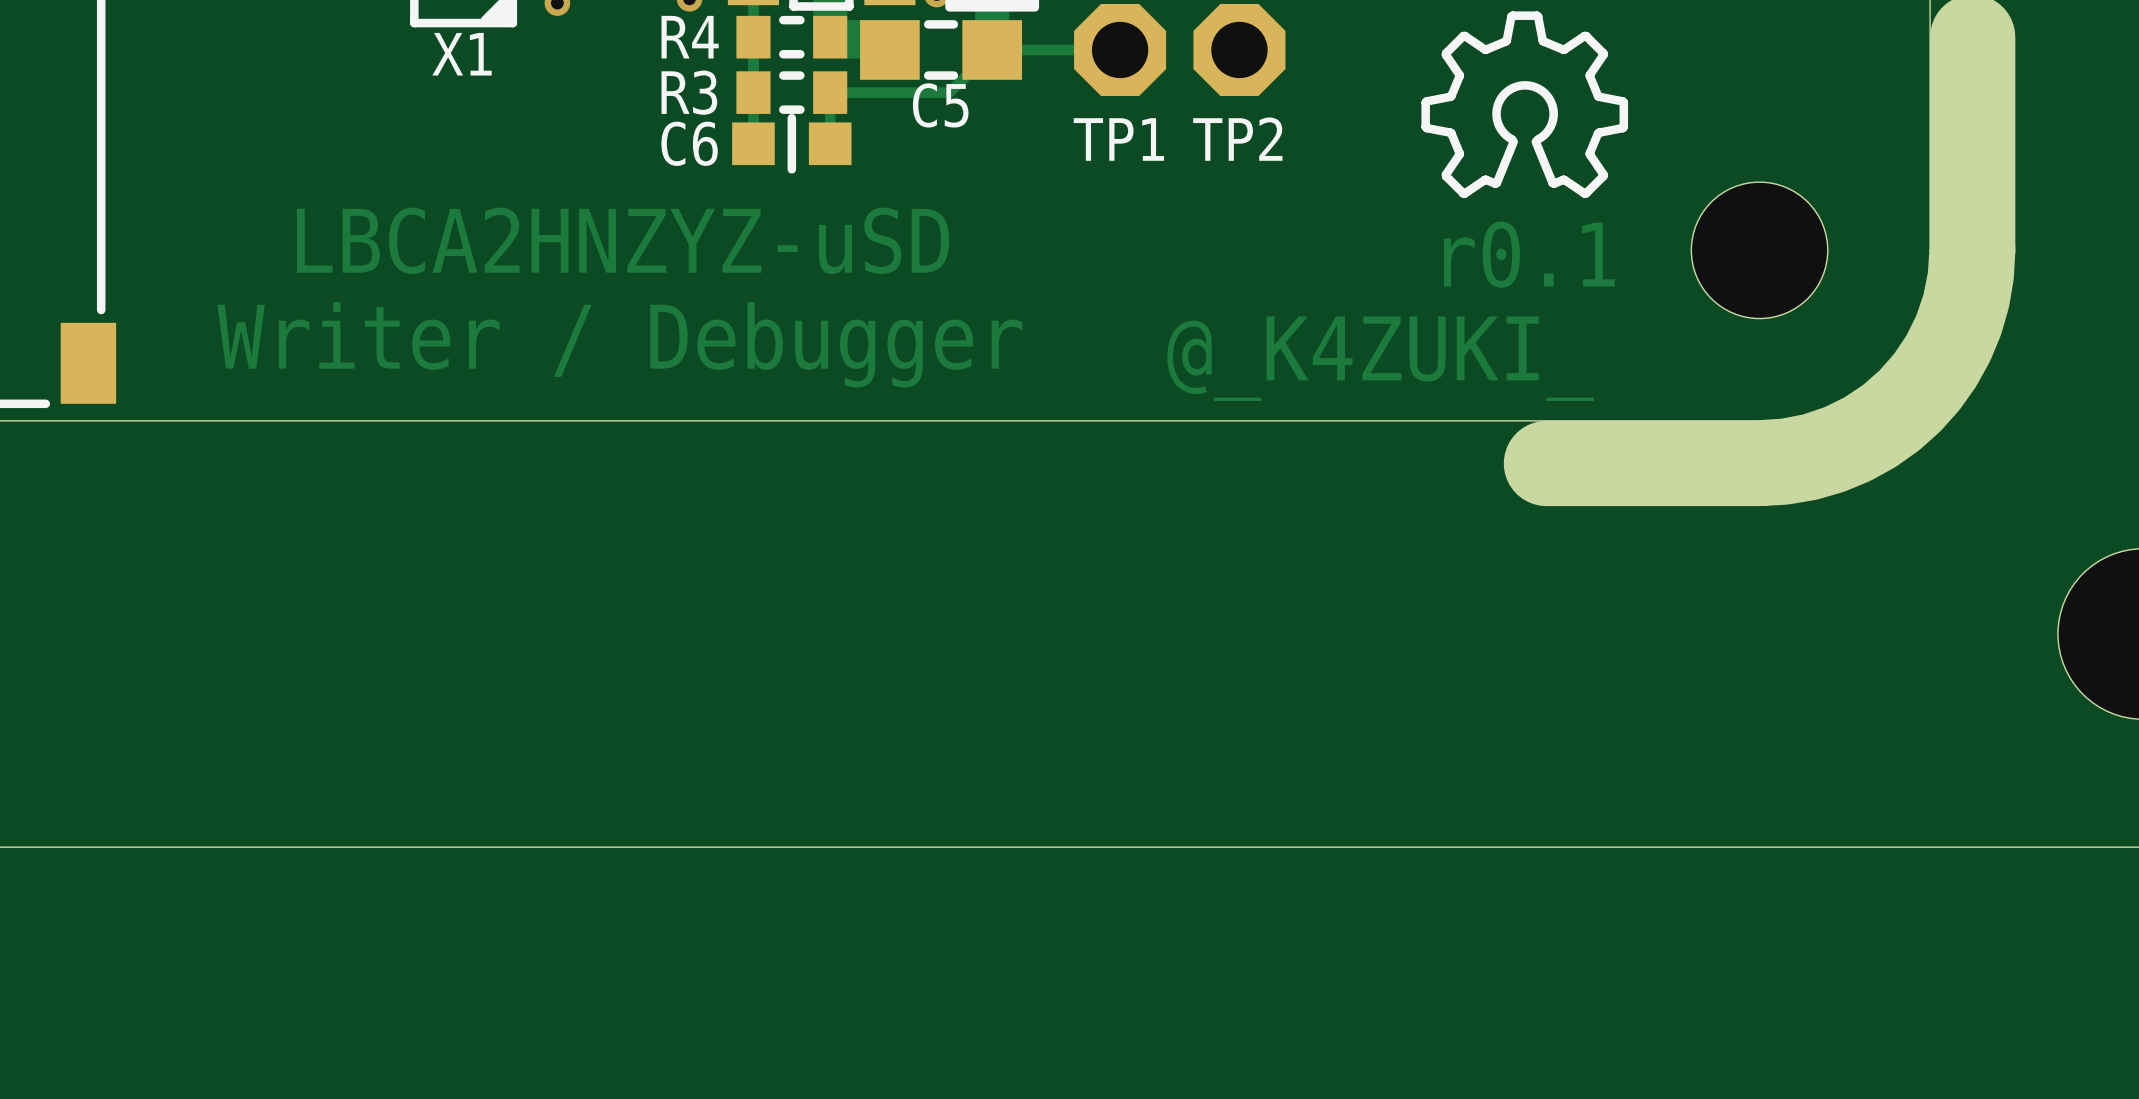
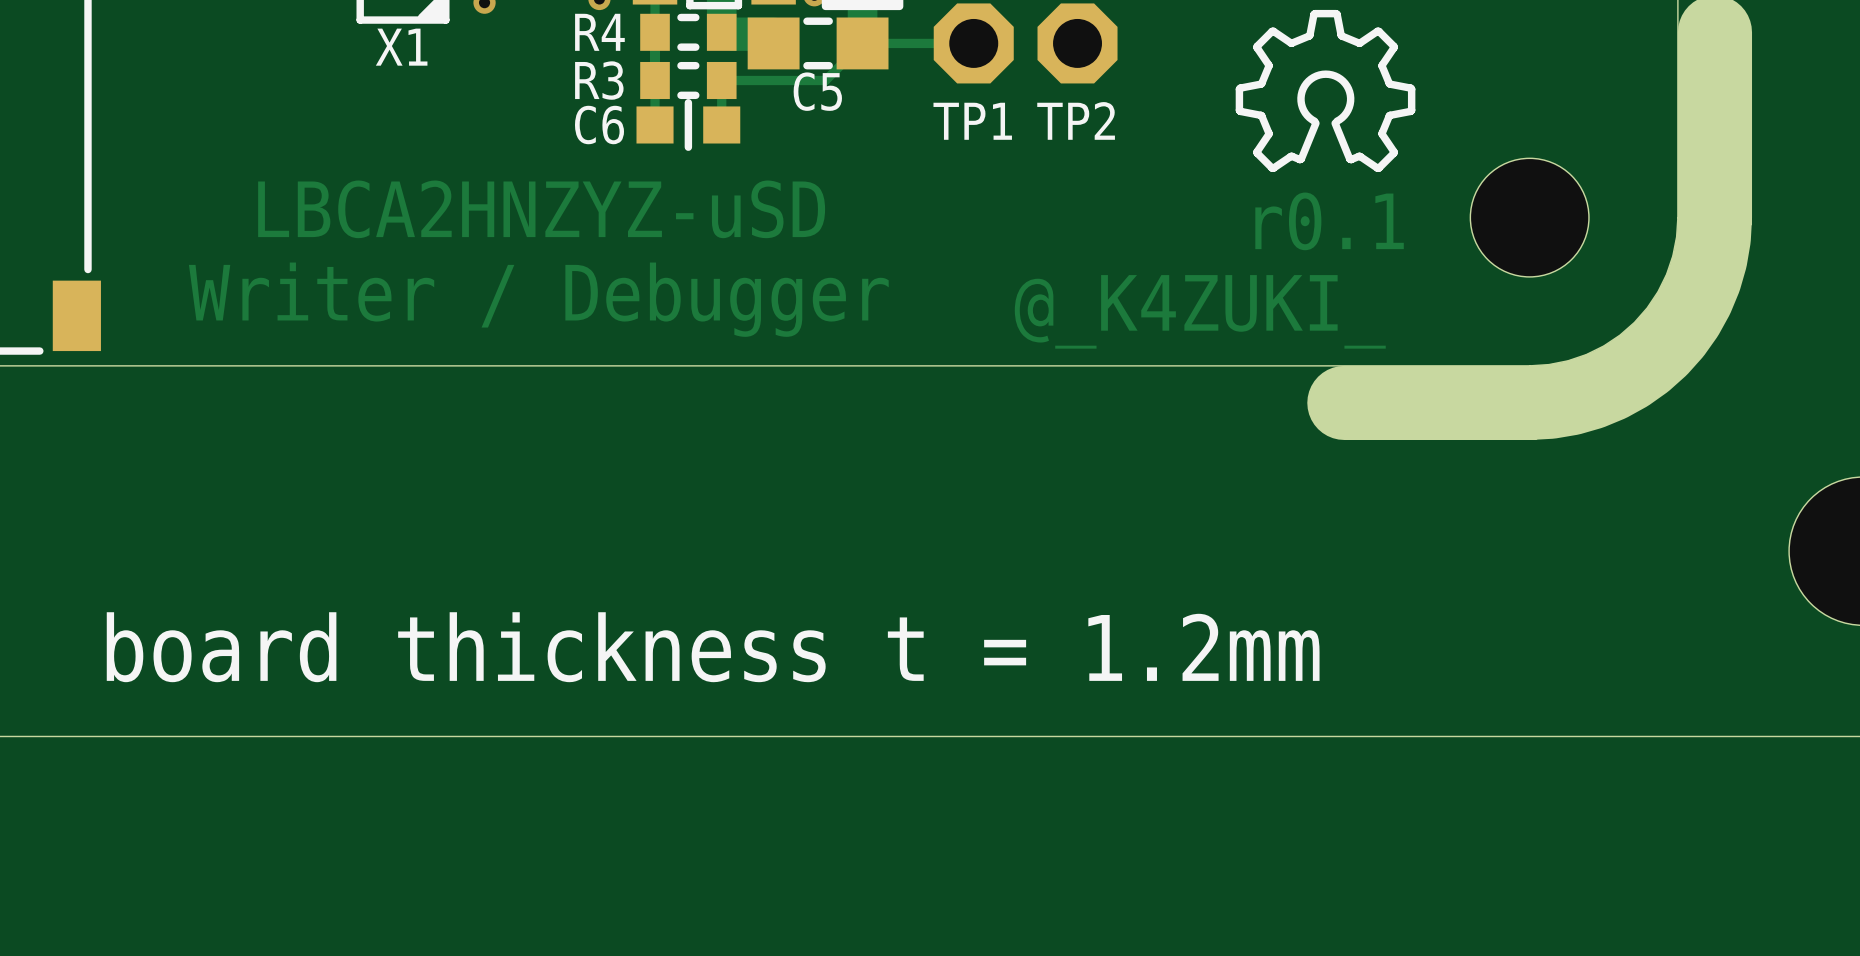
text: none -> board thickness t = 1.2mm (713, 647)

